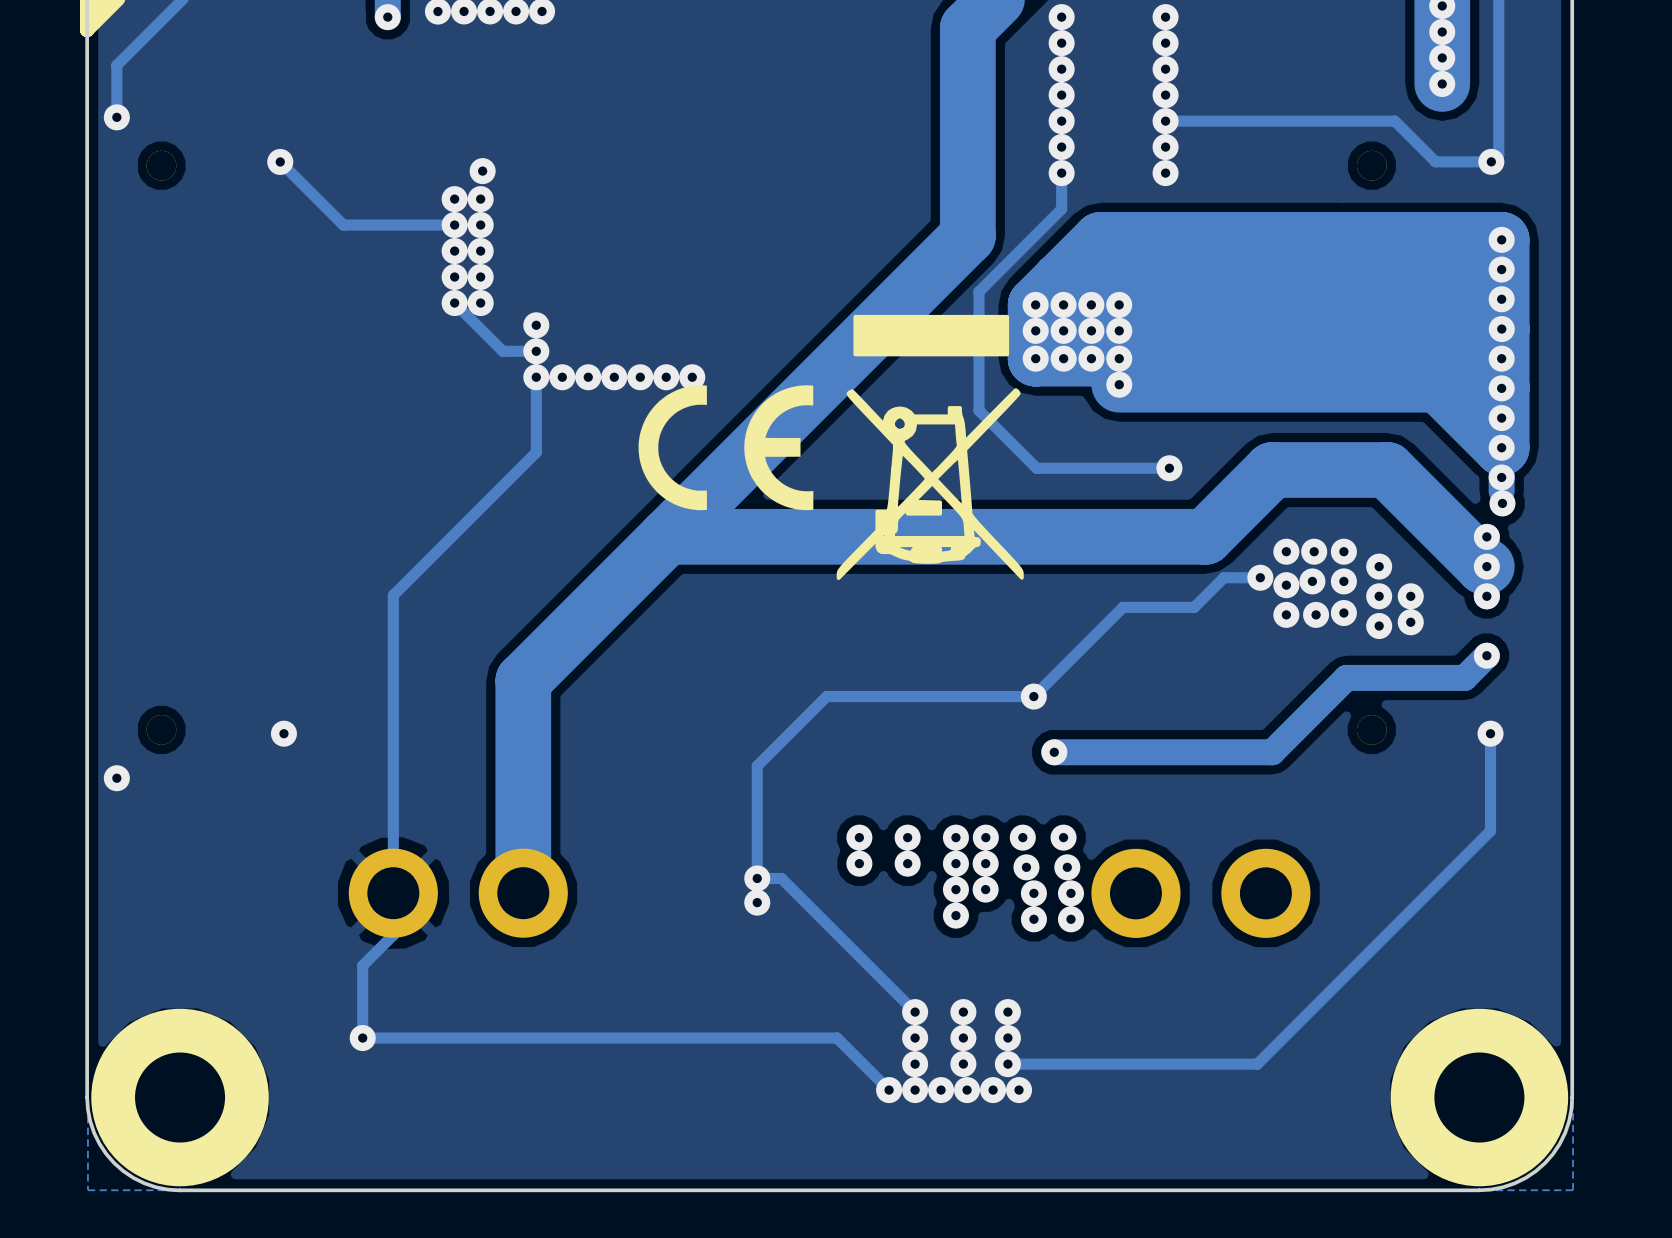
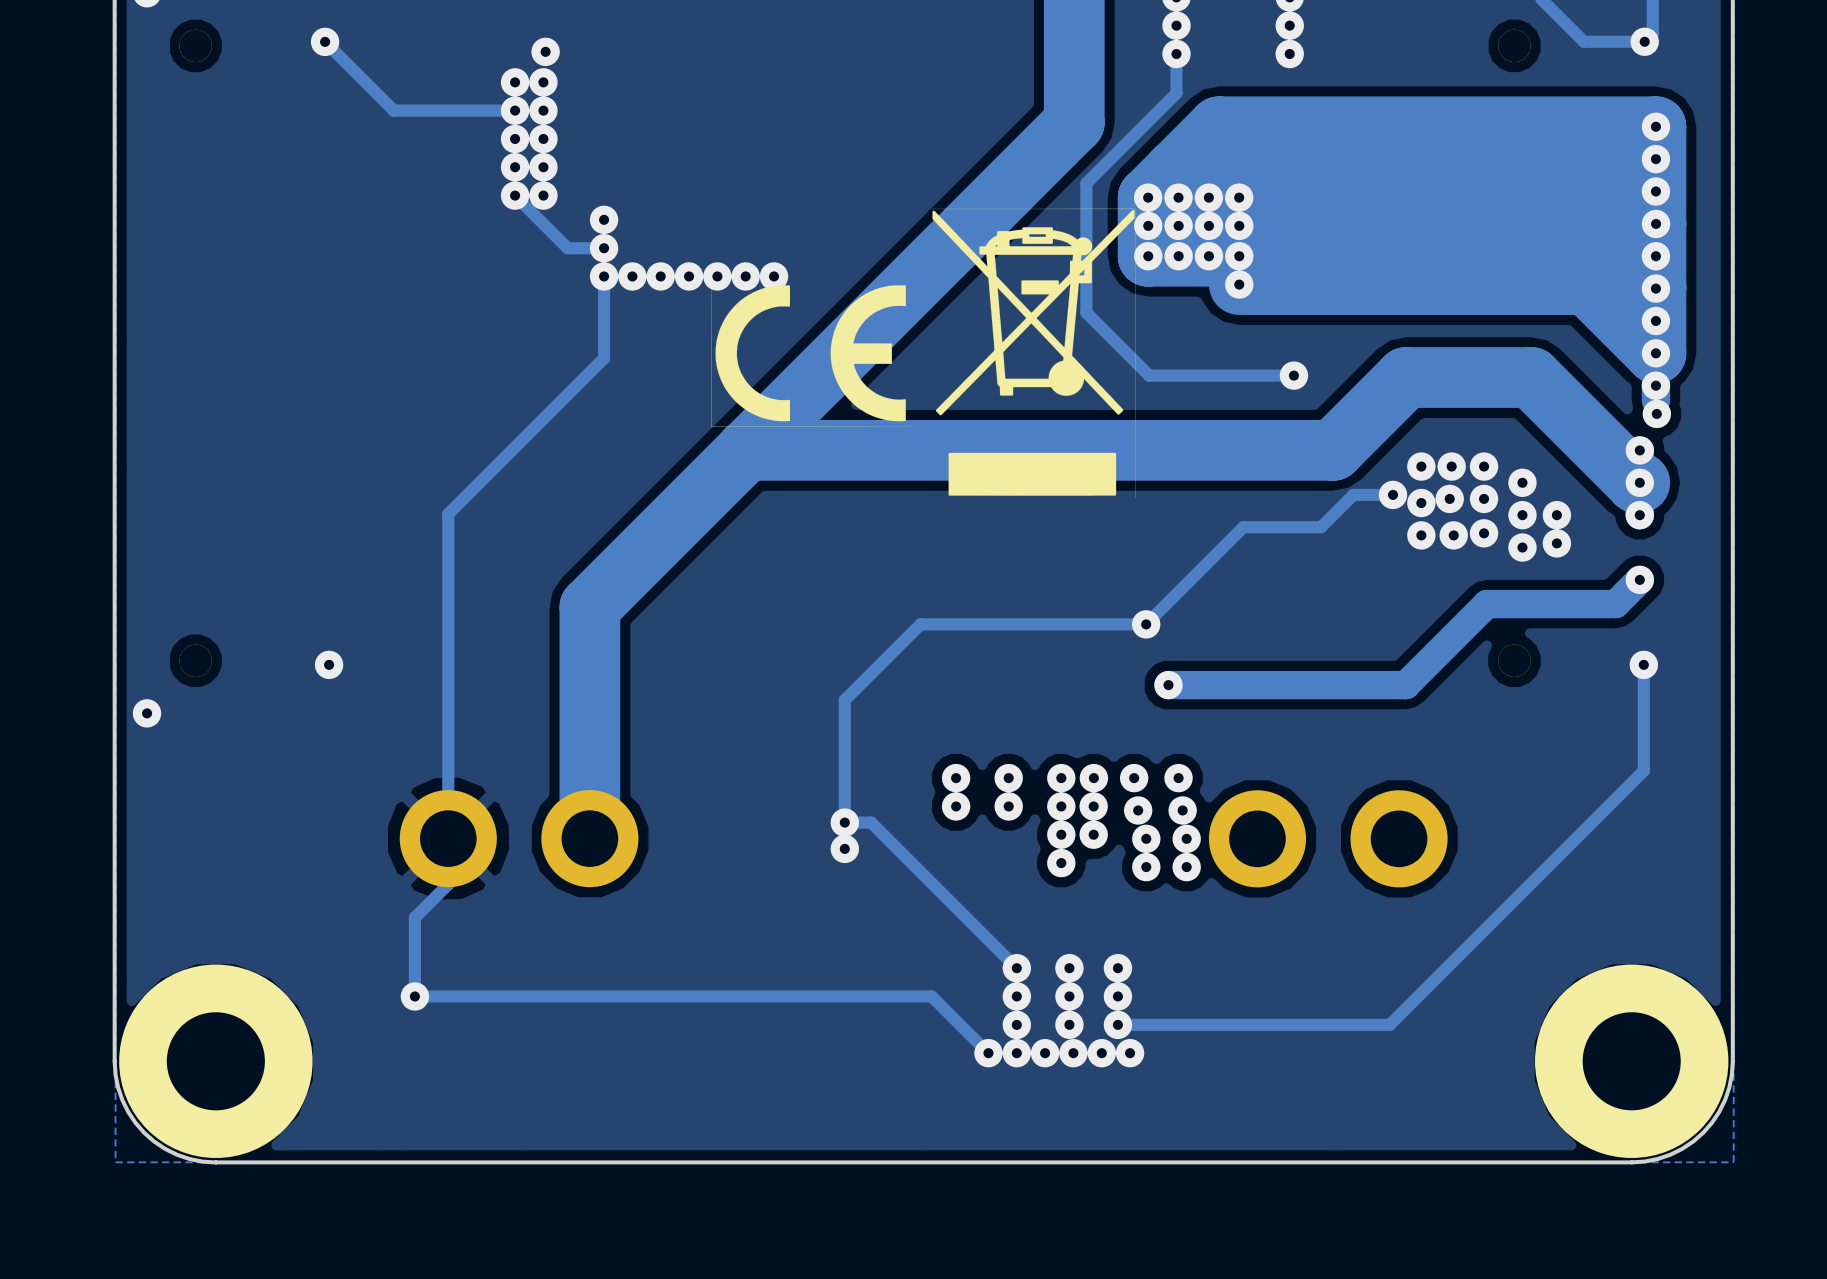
drawing shape: [836, 314, 1024, 581] -> [932, 208, 1136, 498]
drawing shape: [638, 385, 814, 511] -> [711, 279, 914, 427]

